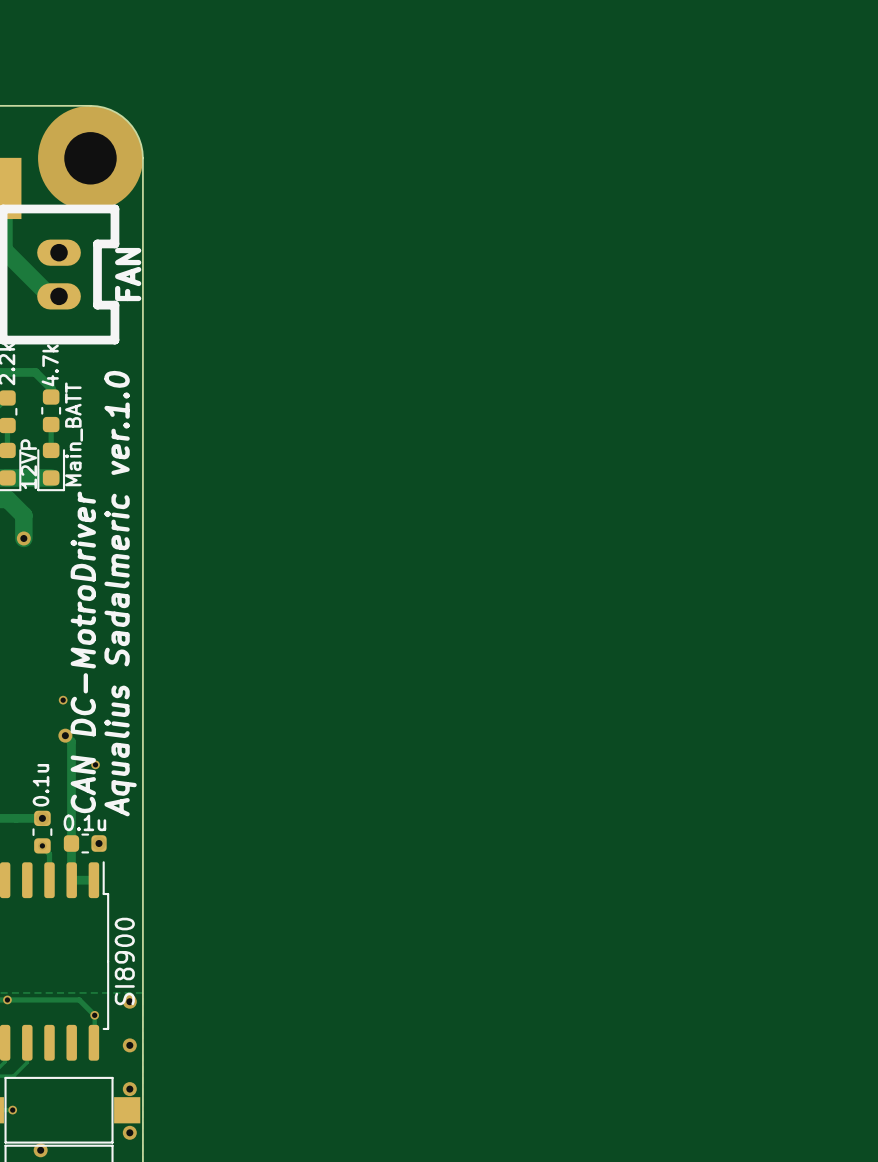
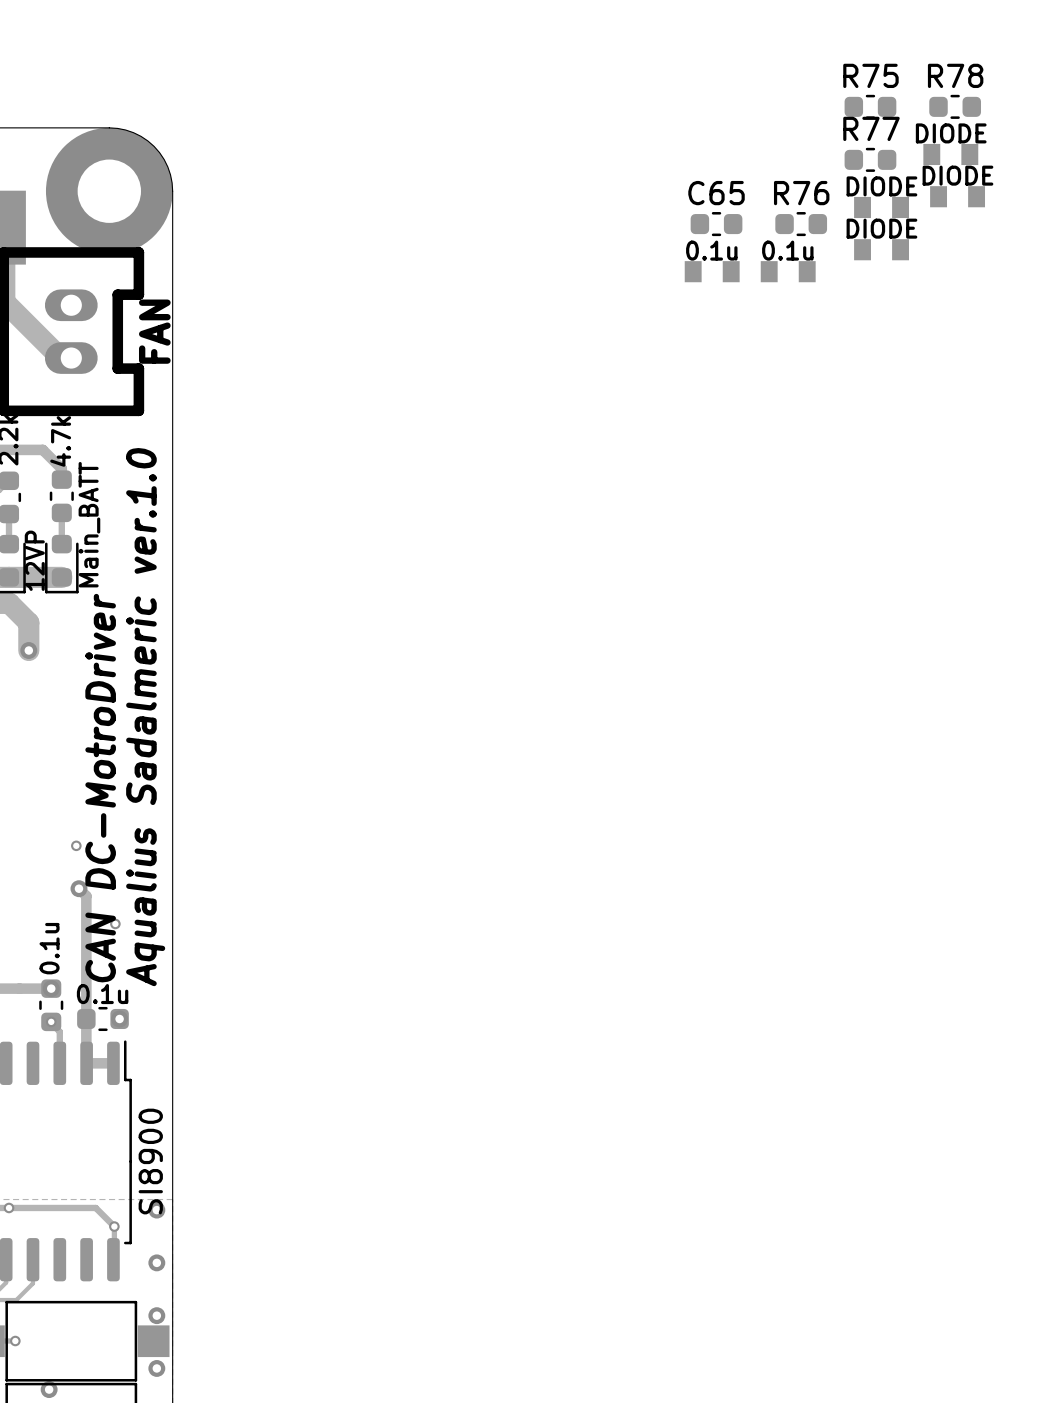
R75: none -> (870, 106)
R78: none -> (955, 106)
part: none -> DIODE (950, 154)
R77: none -> (870, 159)
part: none -> DIODE (957, 196)
part: none -> DIODE (881, 207)
C65: none -> (716, 224)
R76: none -> (801, 224)
part: none -> DIODE (881, 249)
part: none -> 0.1u (712, 271)
part: none -> 0.1u (788, 271)

